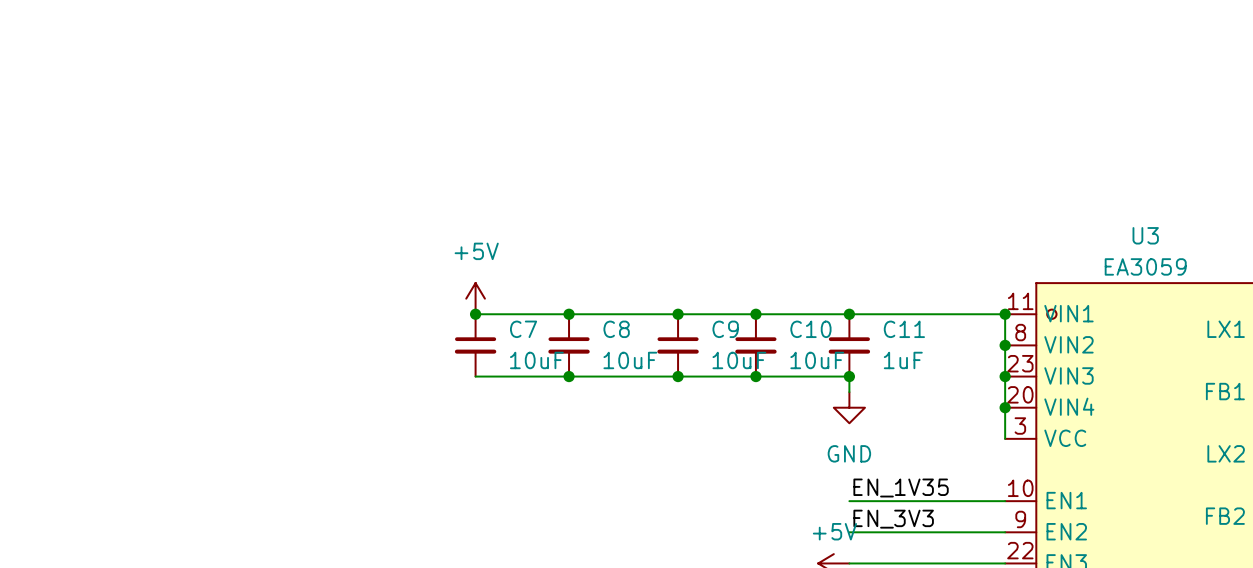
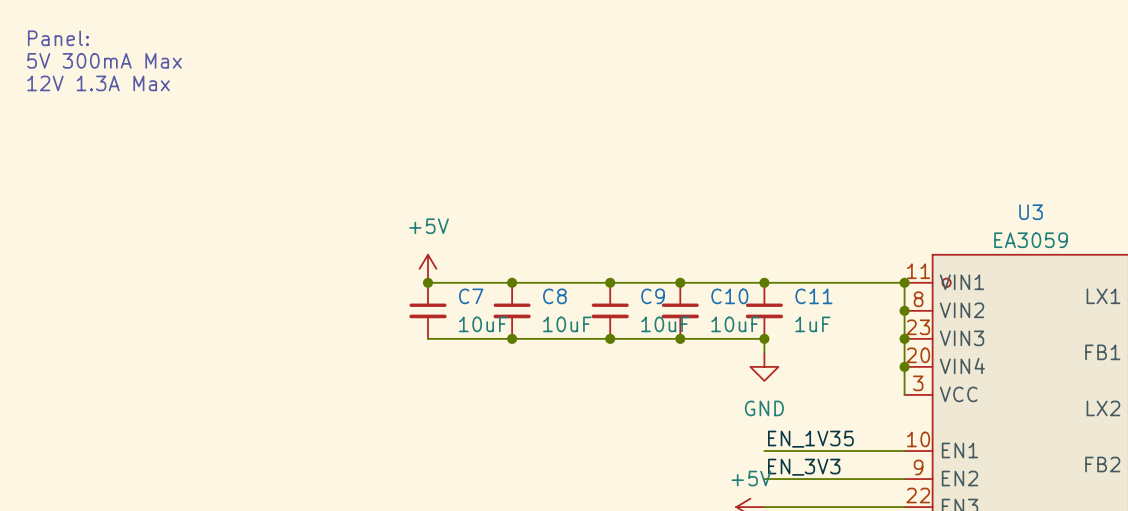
text: none -> Panel: (58, 38)
text: none -> 5V 300mA Max (104, 60)
text: none -> 12V 1.3A Max (98, 83)

